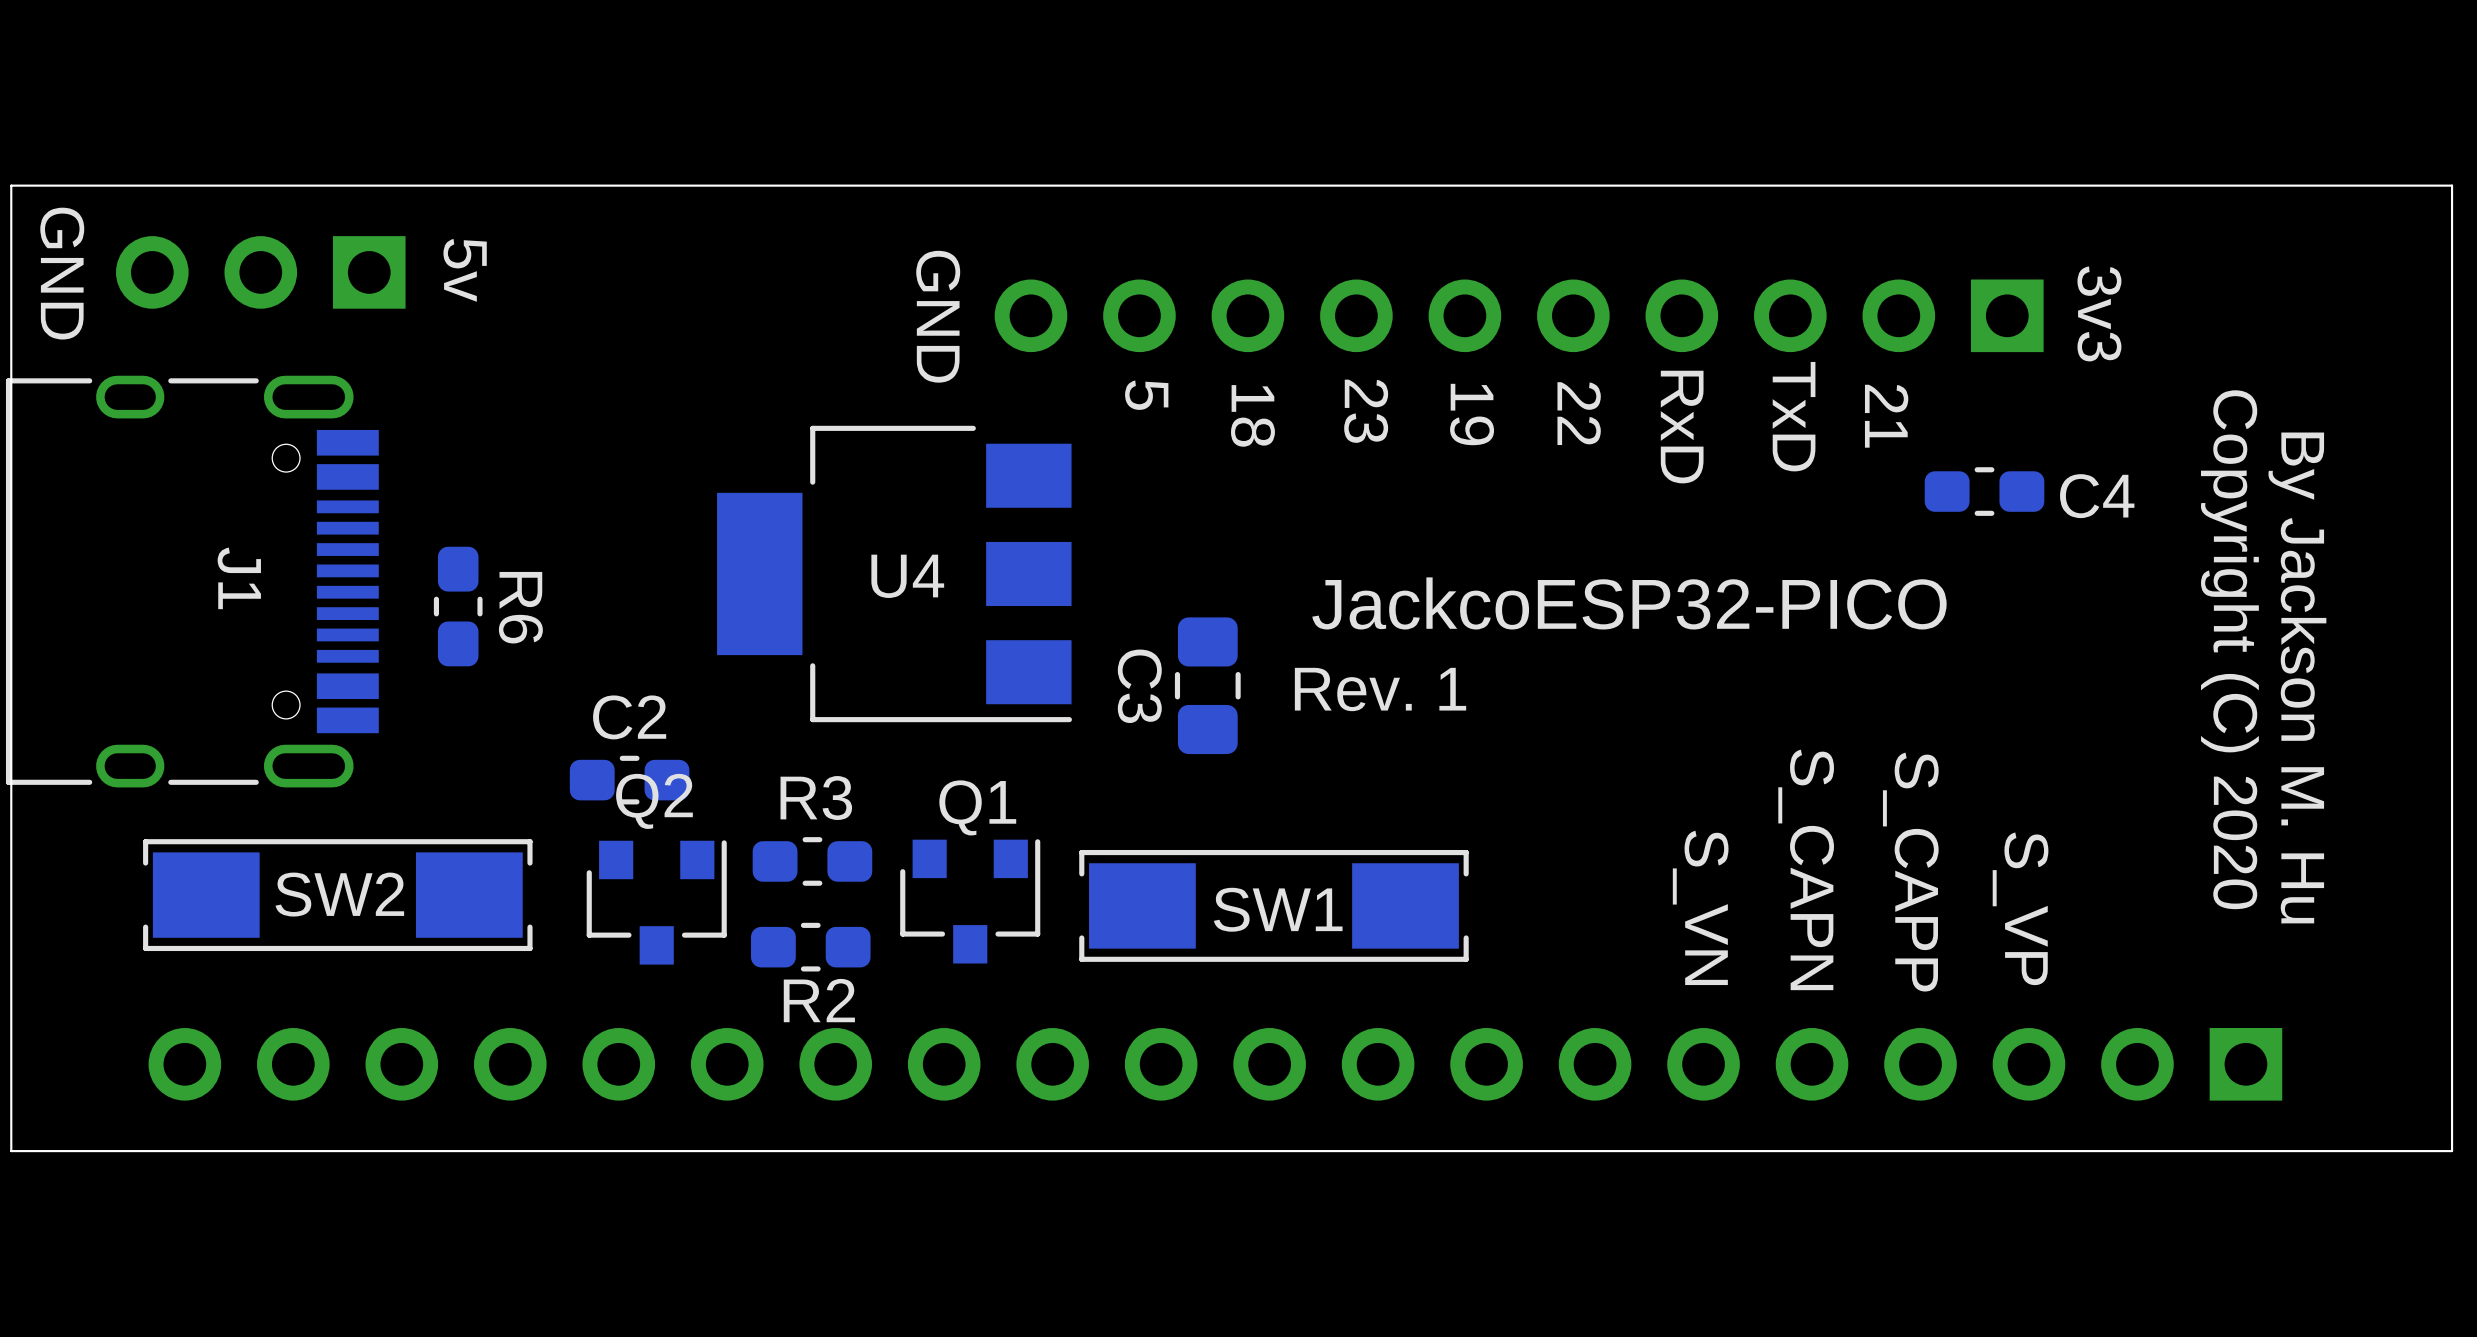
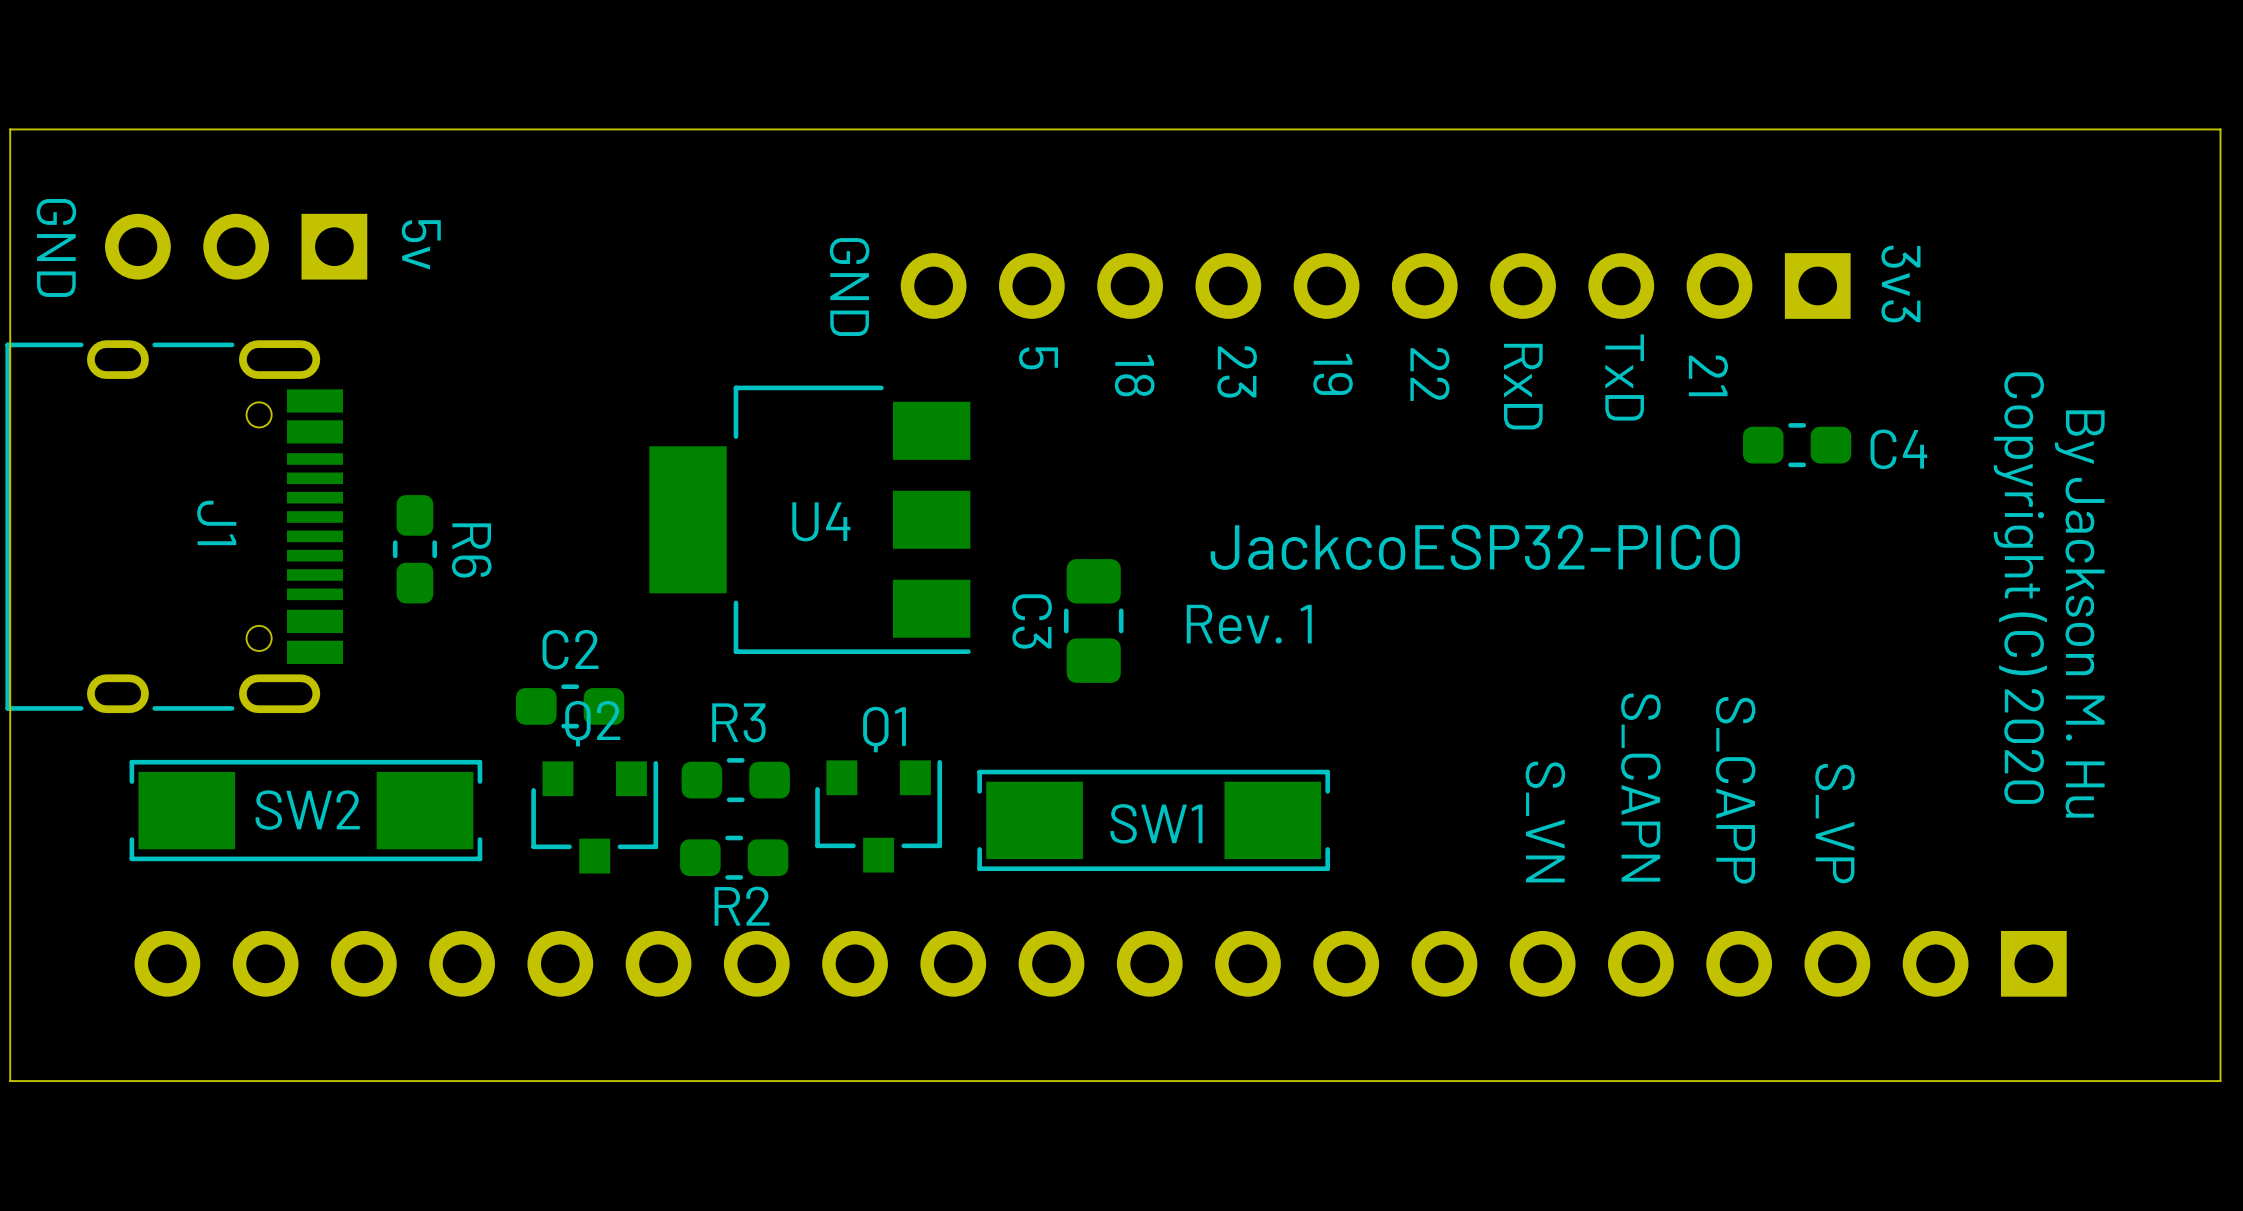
board edge: (2452, 185) (11, 185) -> (2220, 168) (2220, 129) (10, 129) (10, 168)
board edge: (2452, 1151) (11, 1151) -> (2220, 1042) (2220, 1081) (10, 1081) (10, 1042)

